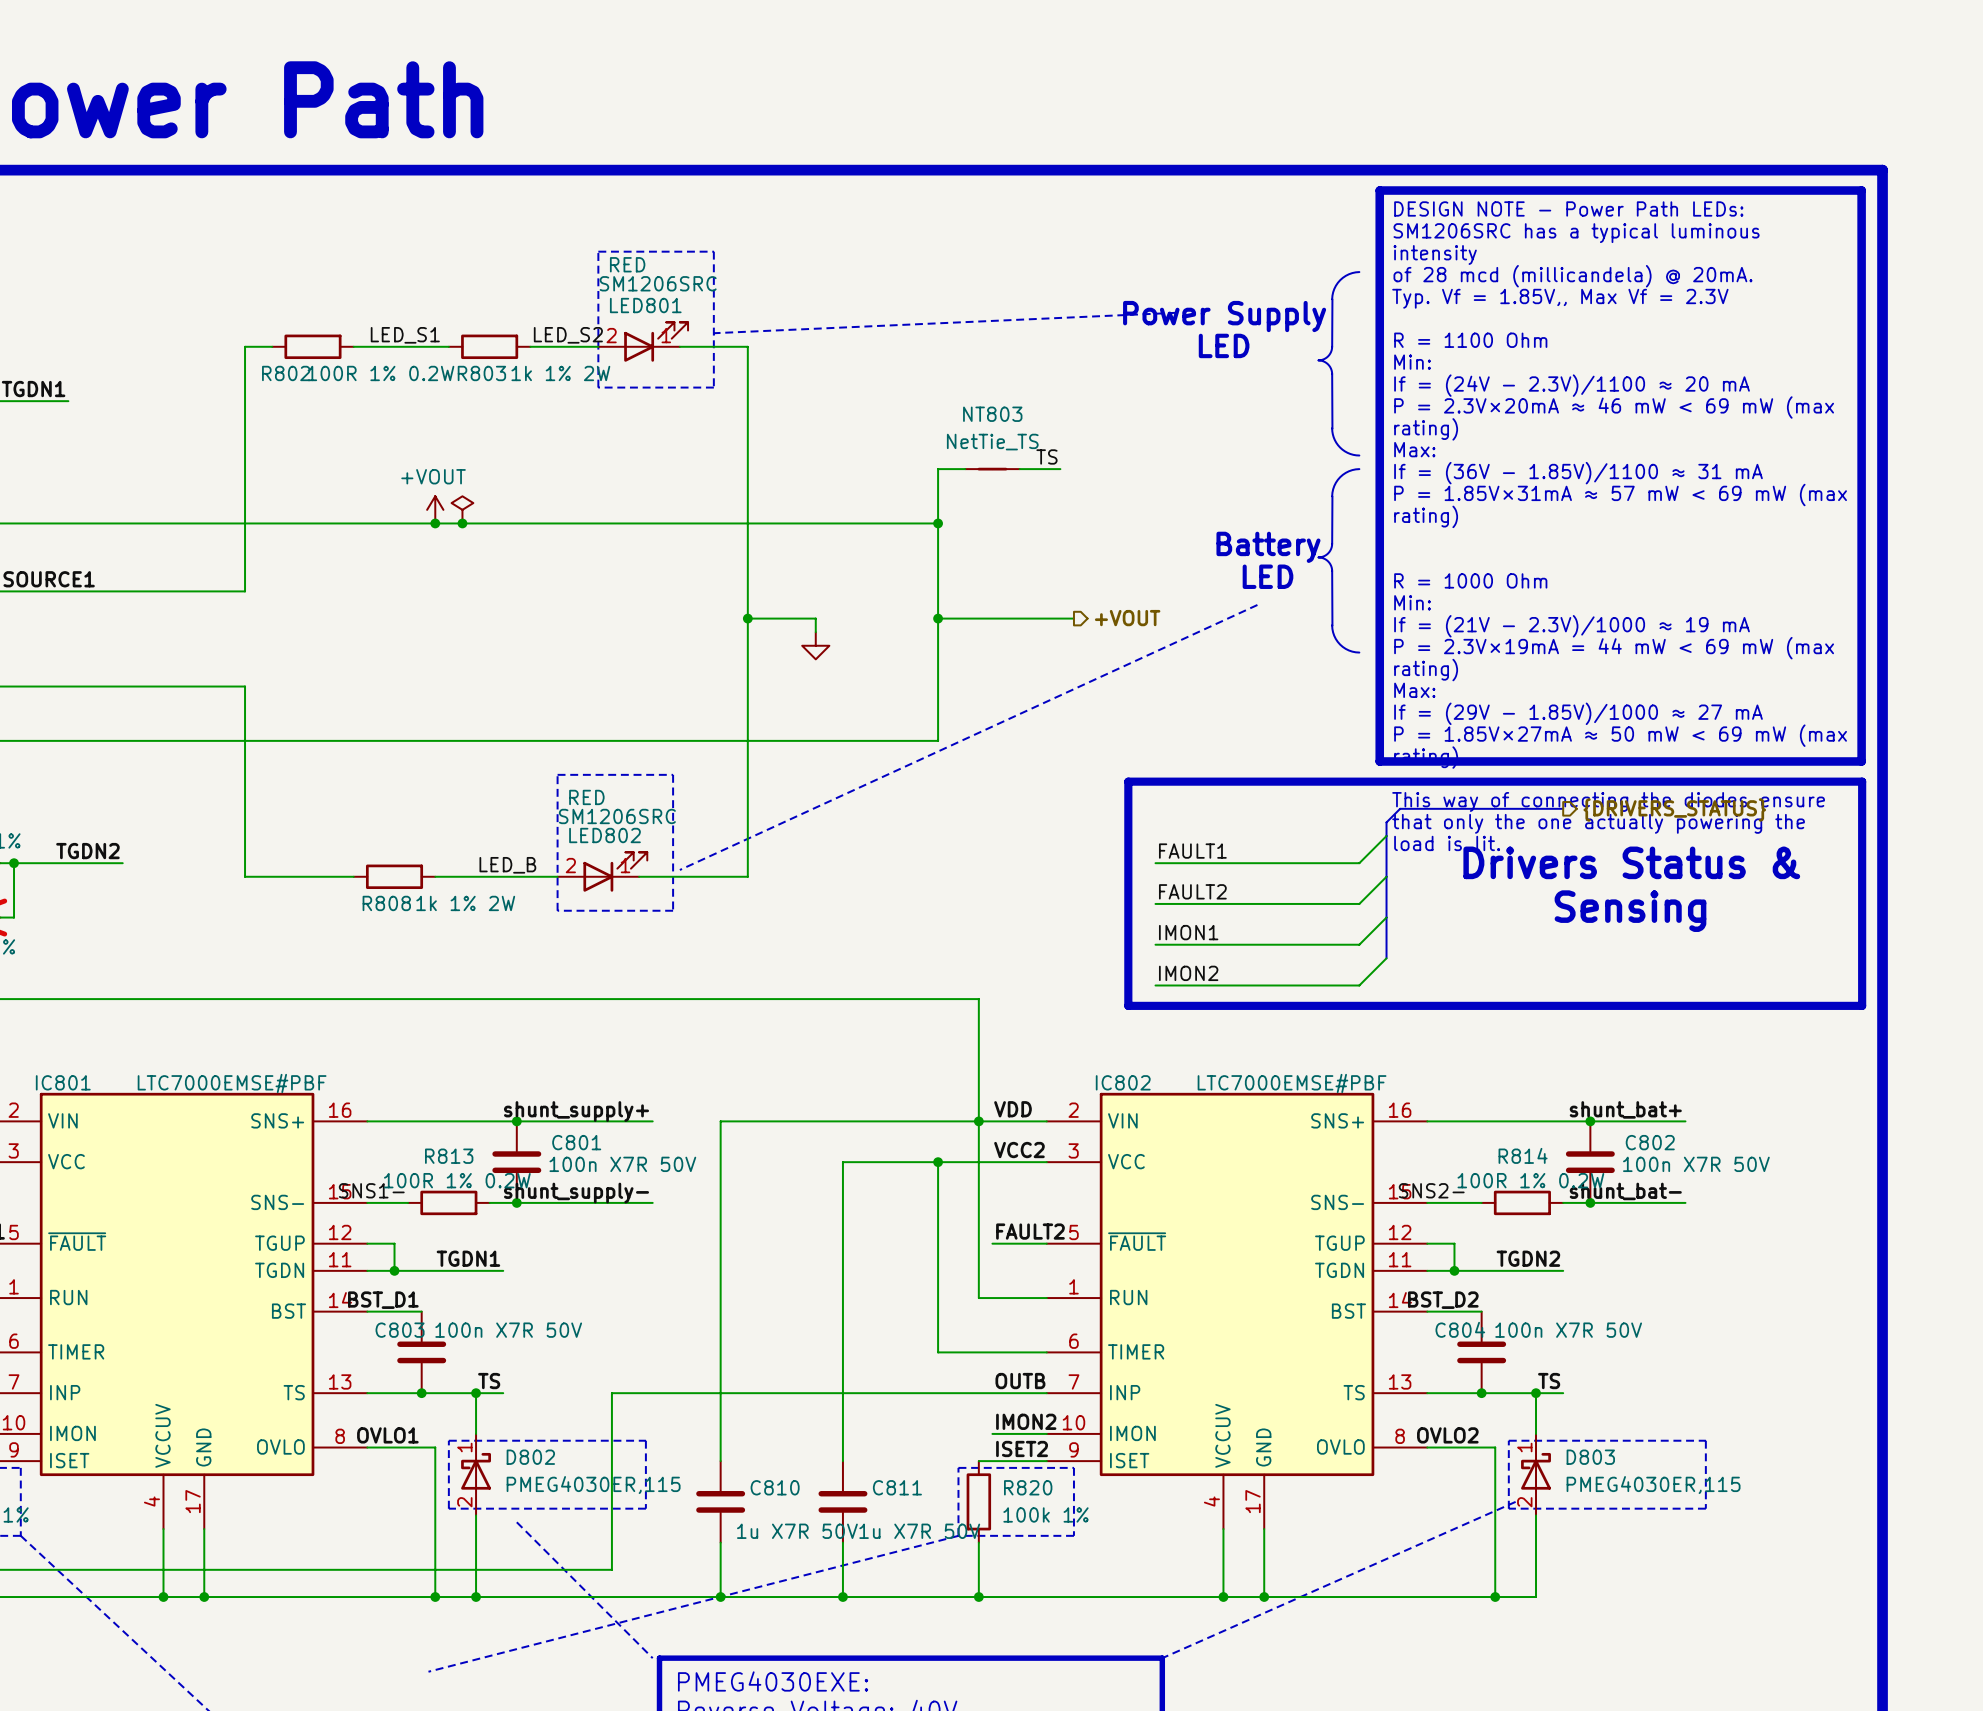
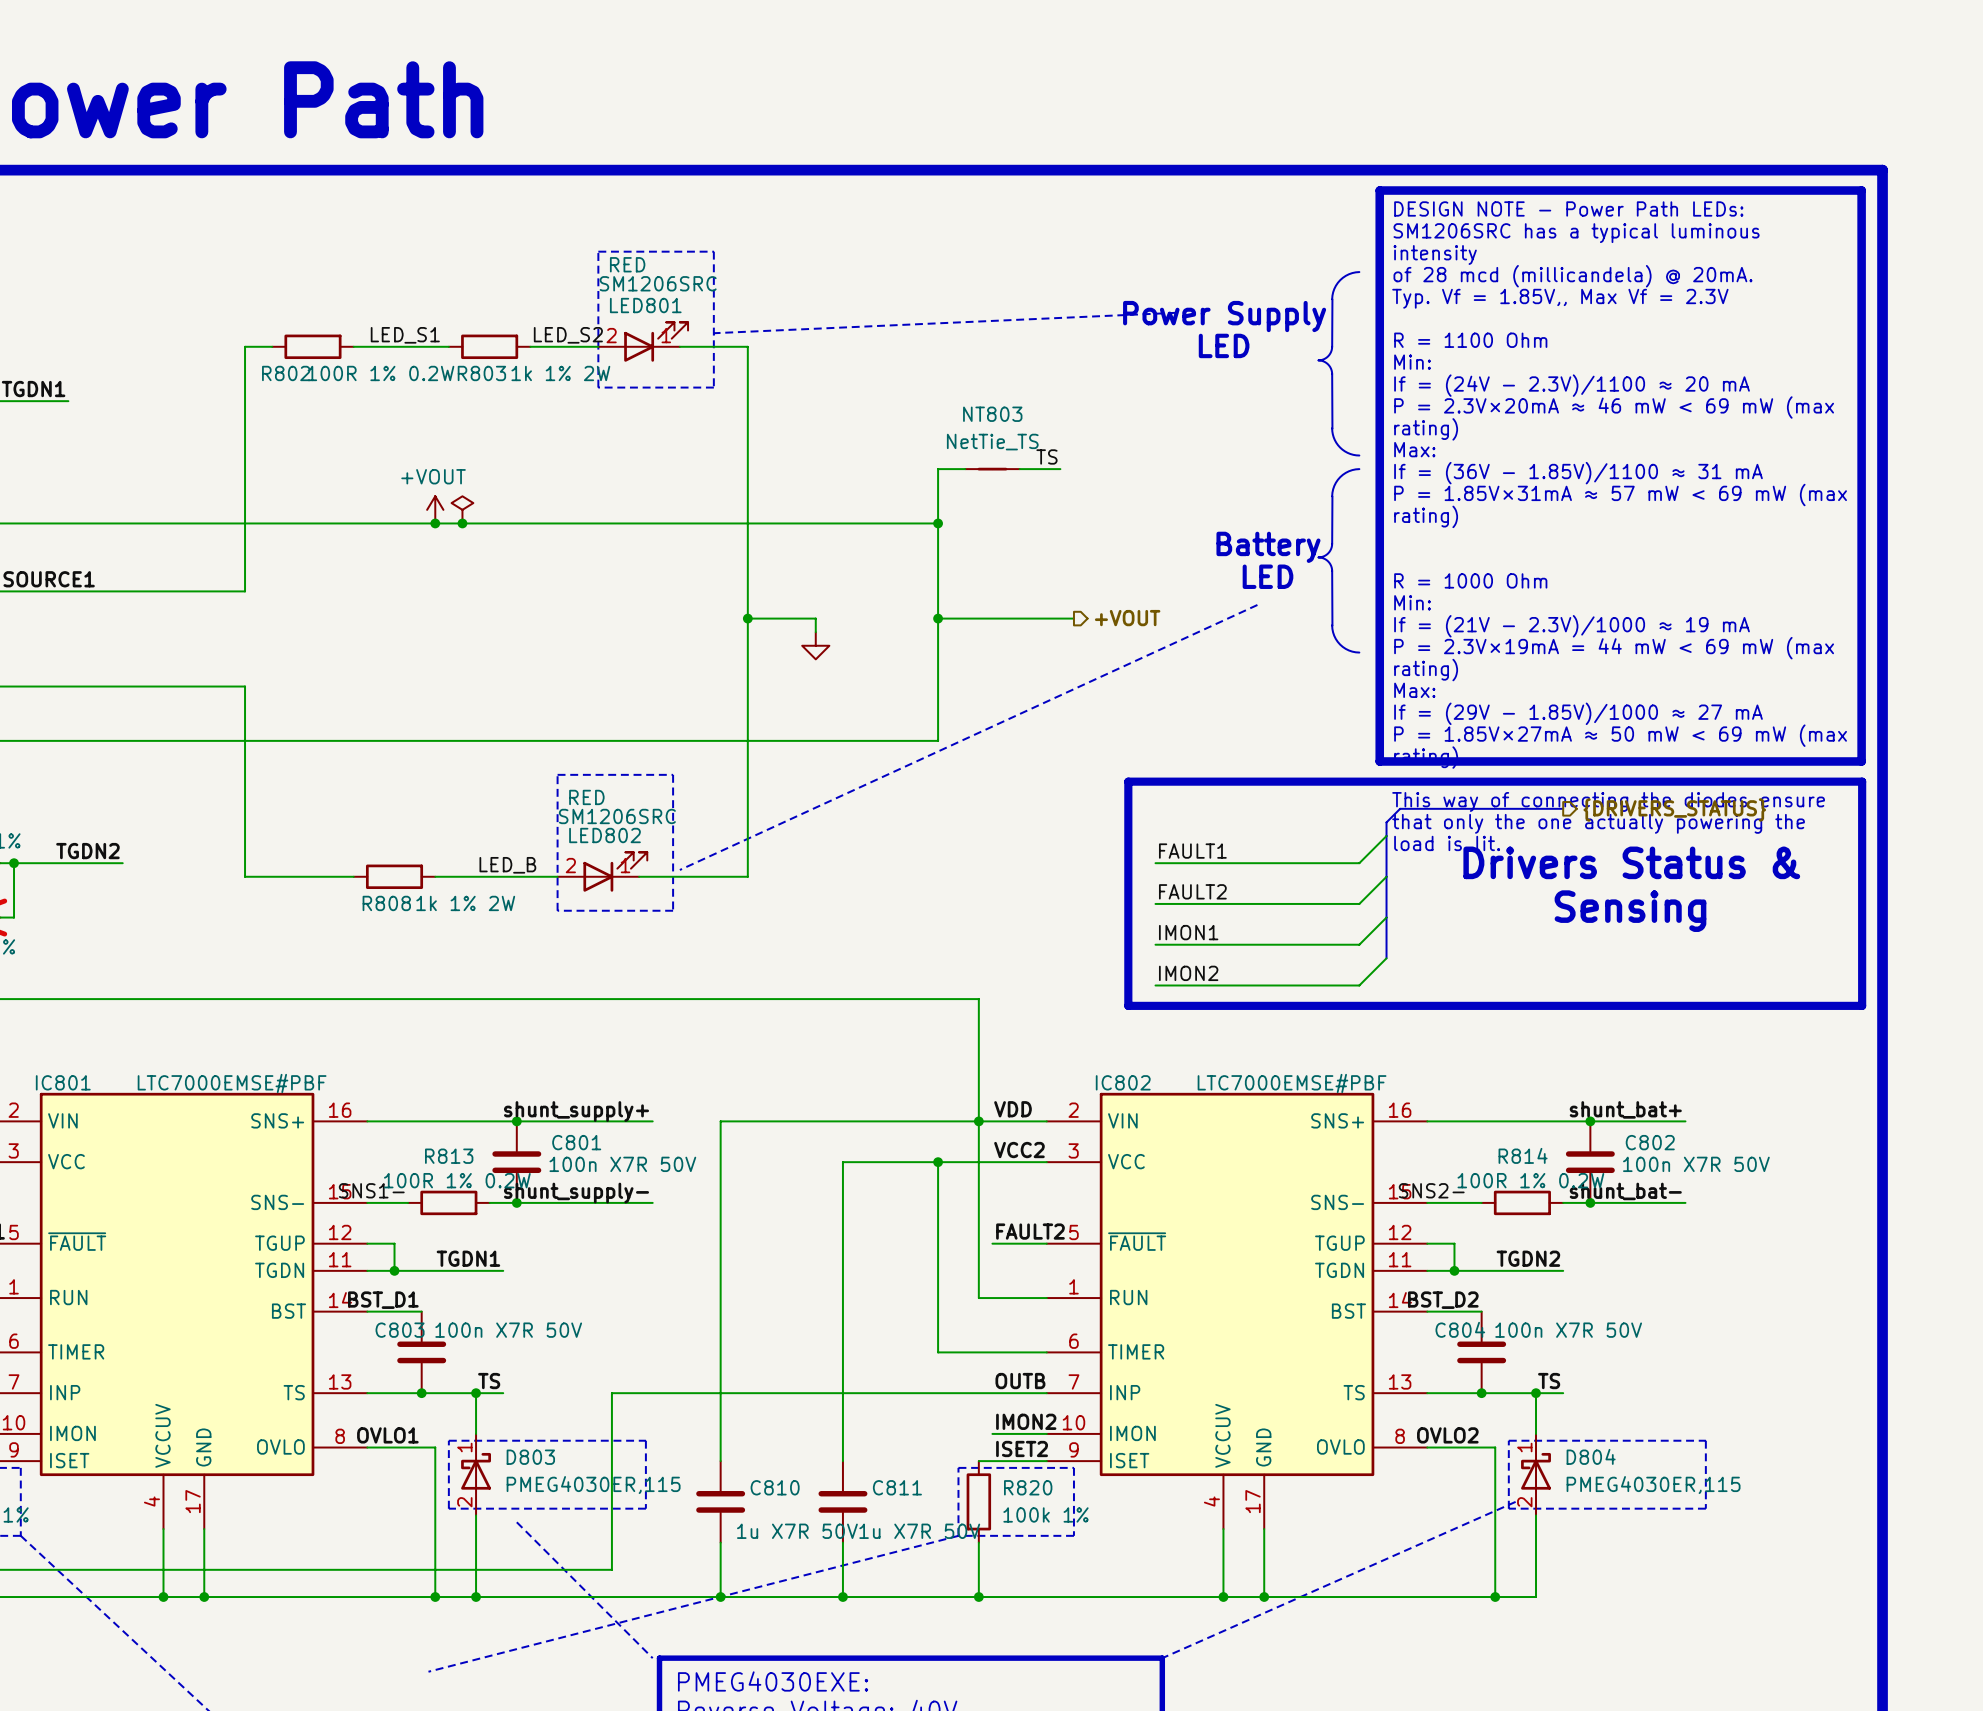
D802 name: D802 (530, 1457) -> D803 (530, 1457)
D803 name: D803 (1590, 1457) -> D804 (1591, 1456)

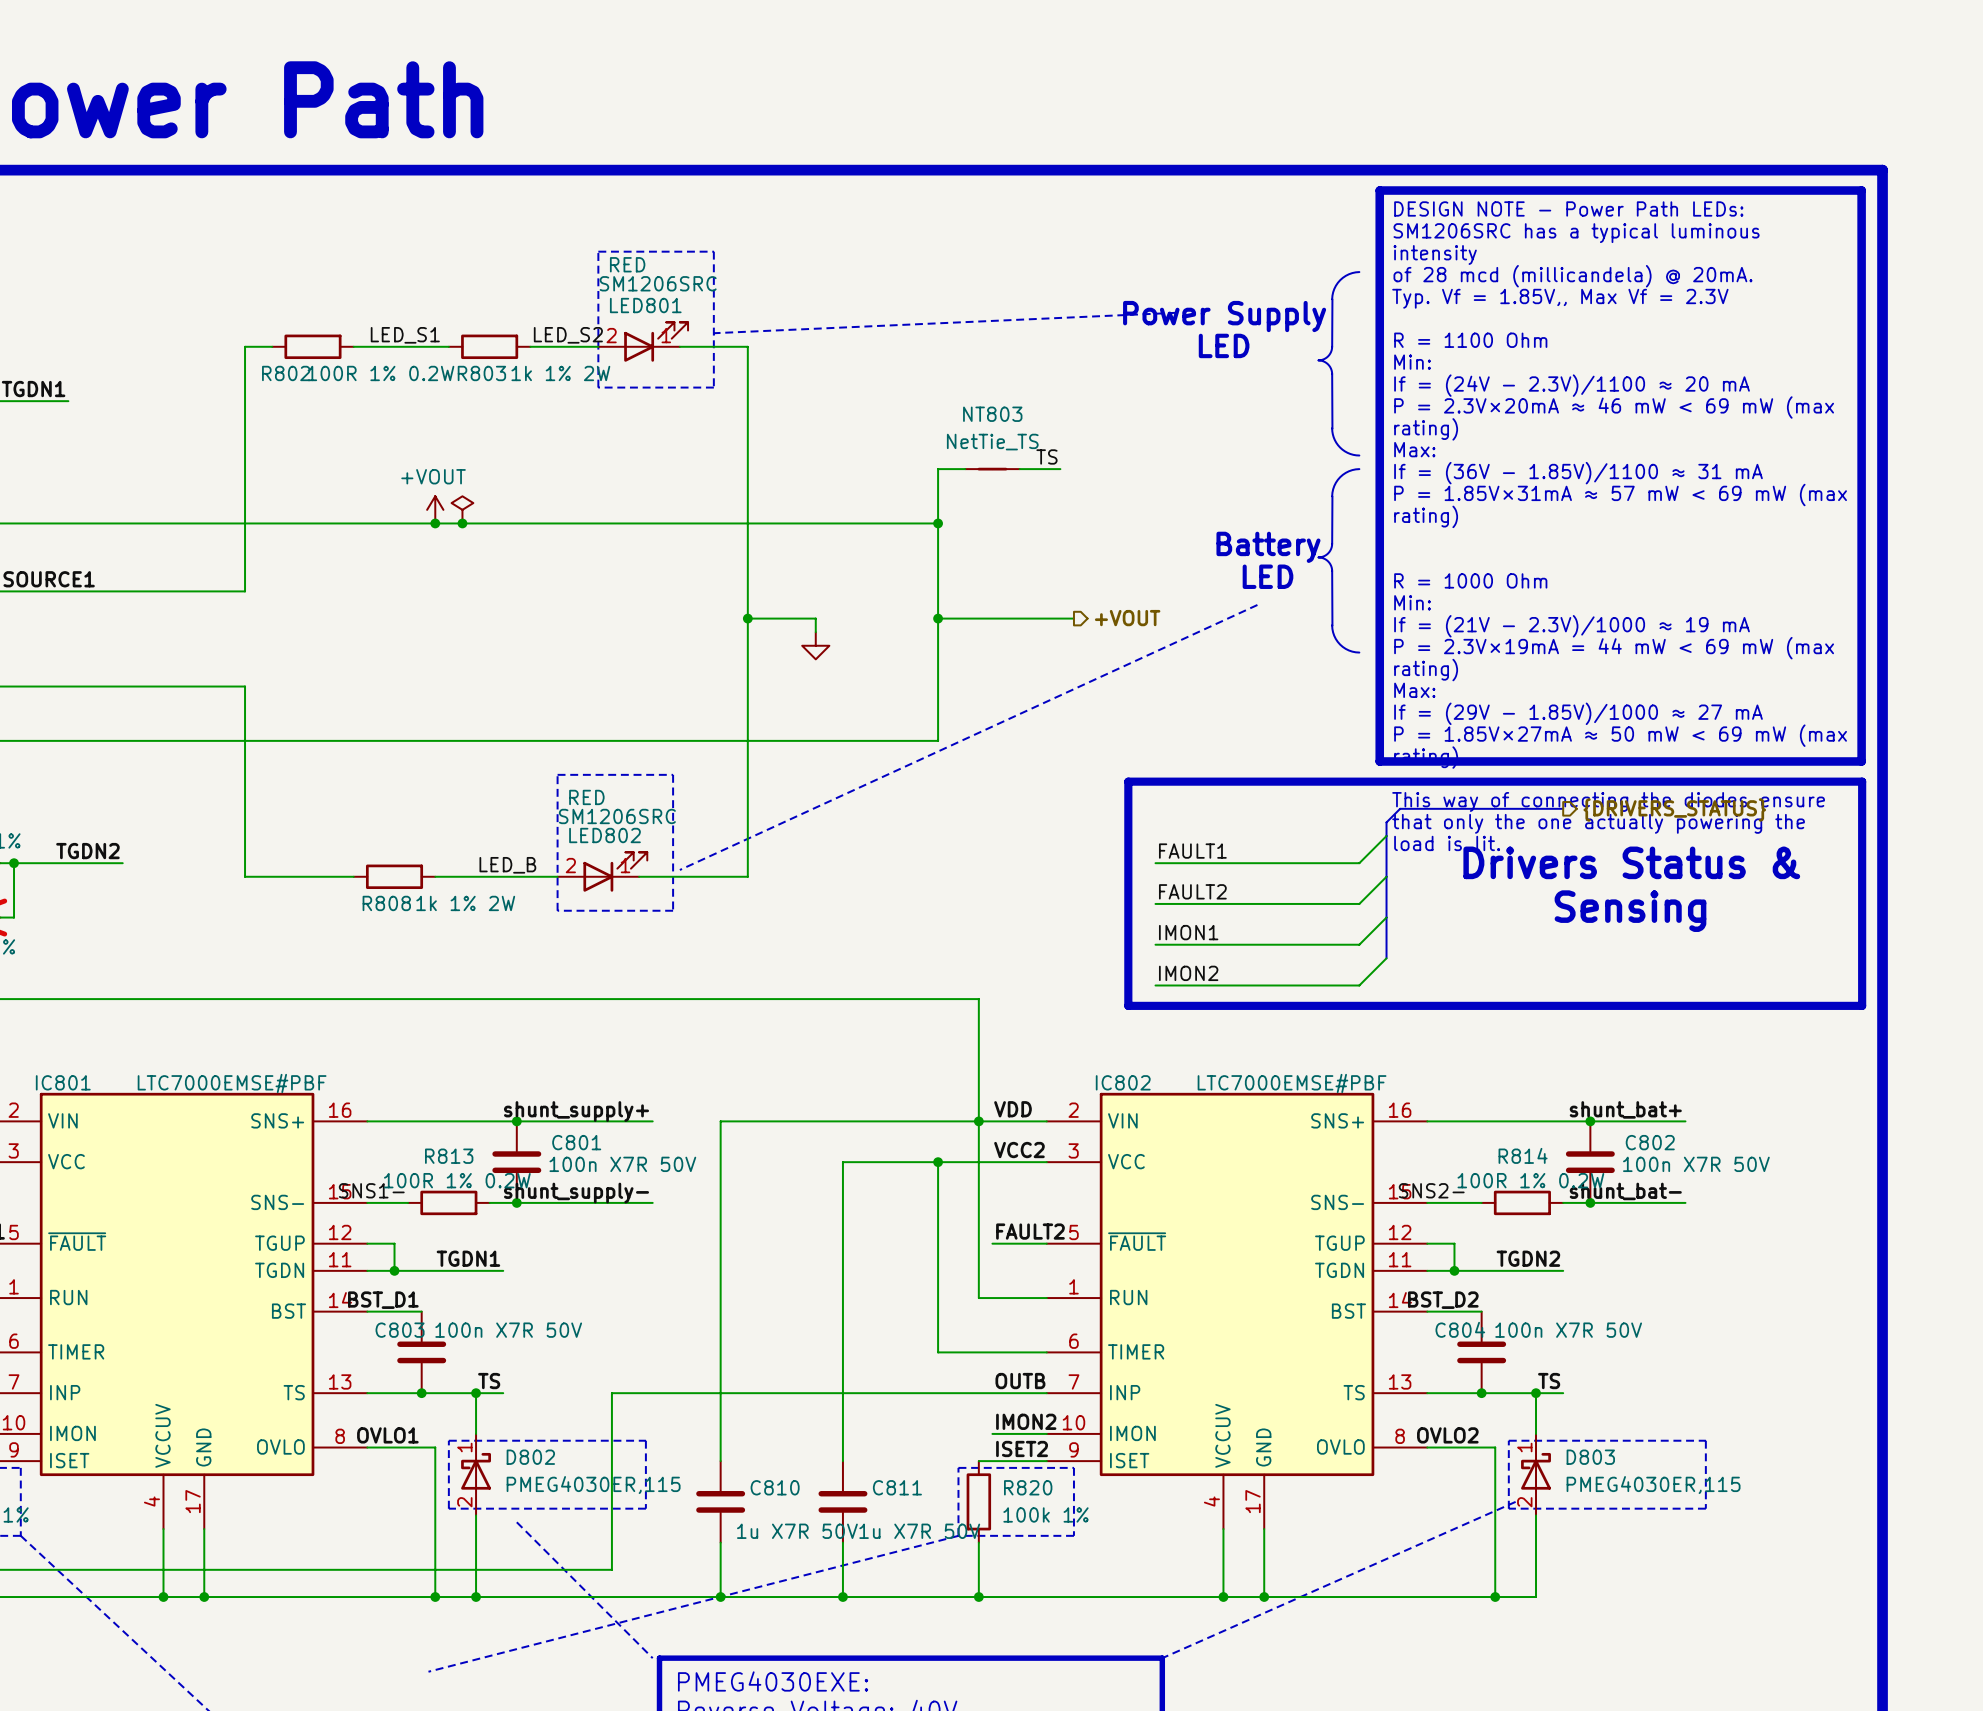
D804 name: D804 (1591, 1456) -> D803 (1590, 1457)
D803 name: D803 (530, 1457) -> D802 (530, 1457)

